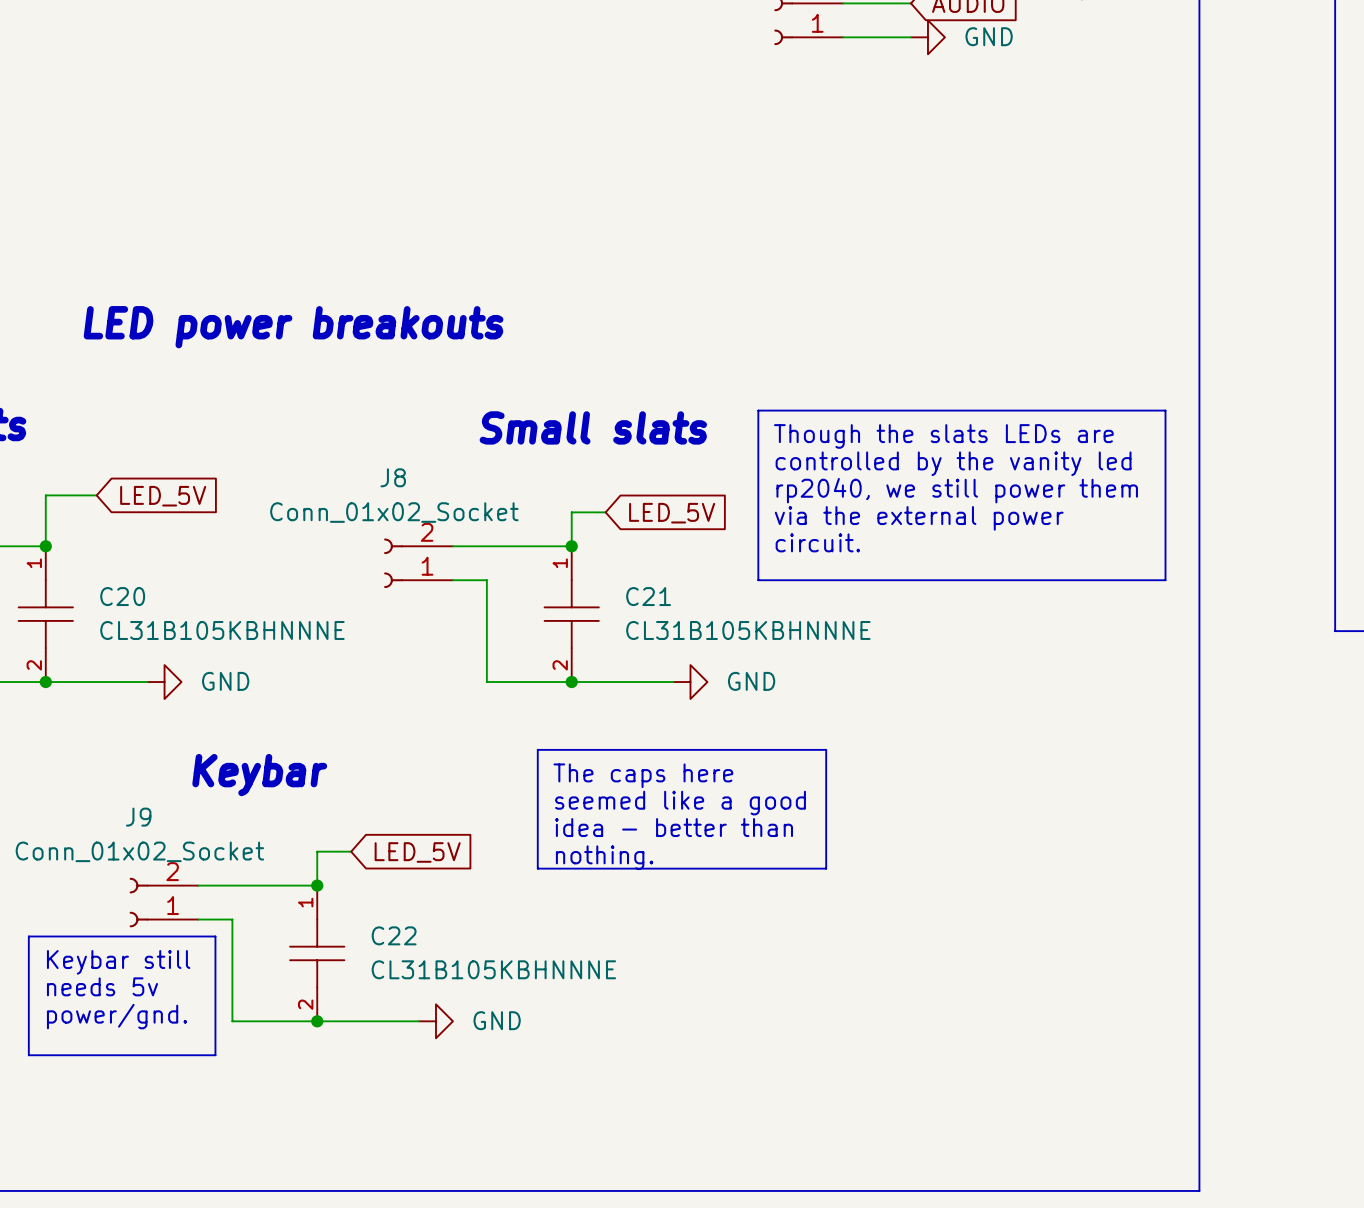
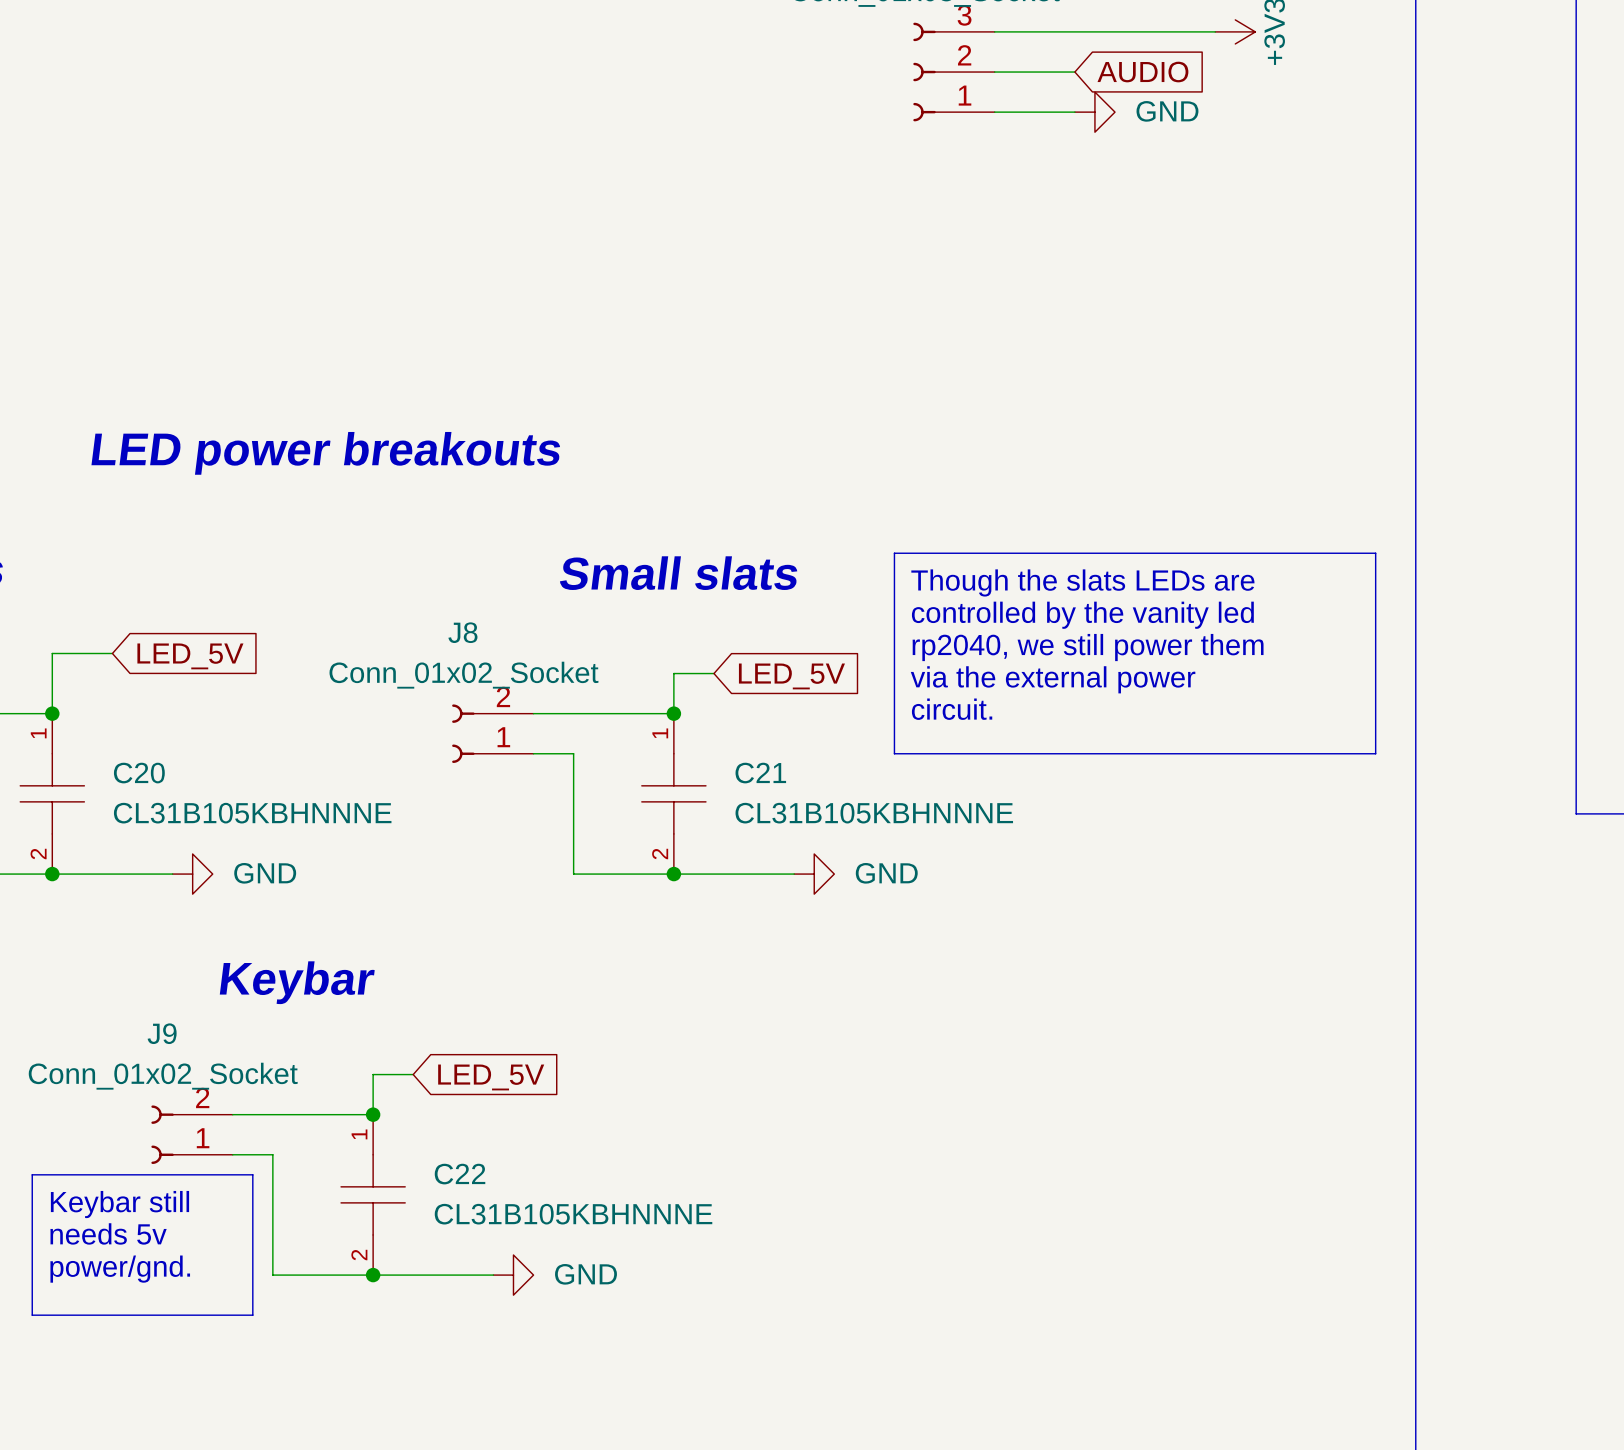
line: (537, 749) (826, 749) (826, 868) (537, 868) (537, 749) -> none
text: The caps here (643, 775) -> none
text: seemed like a good (680, 803) -> none
text: idea - better than (674, 827) -> none
text: nothing. (604, 857) -> none

